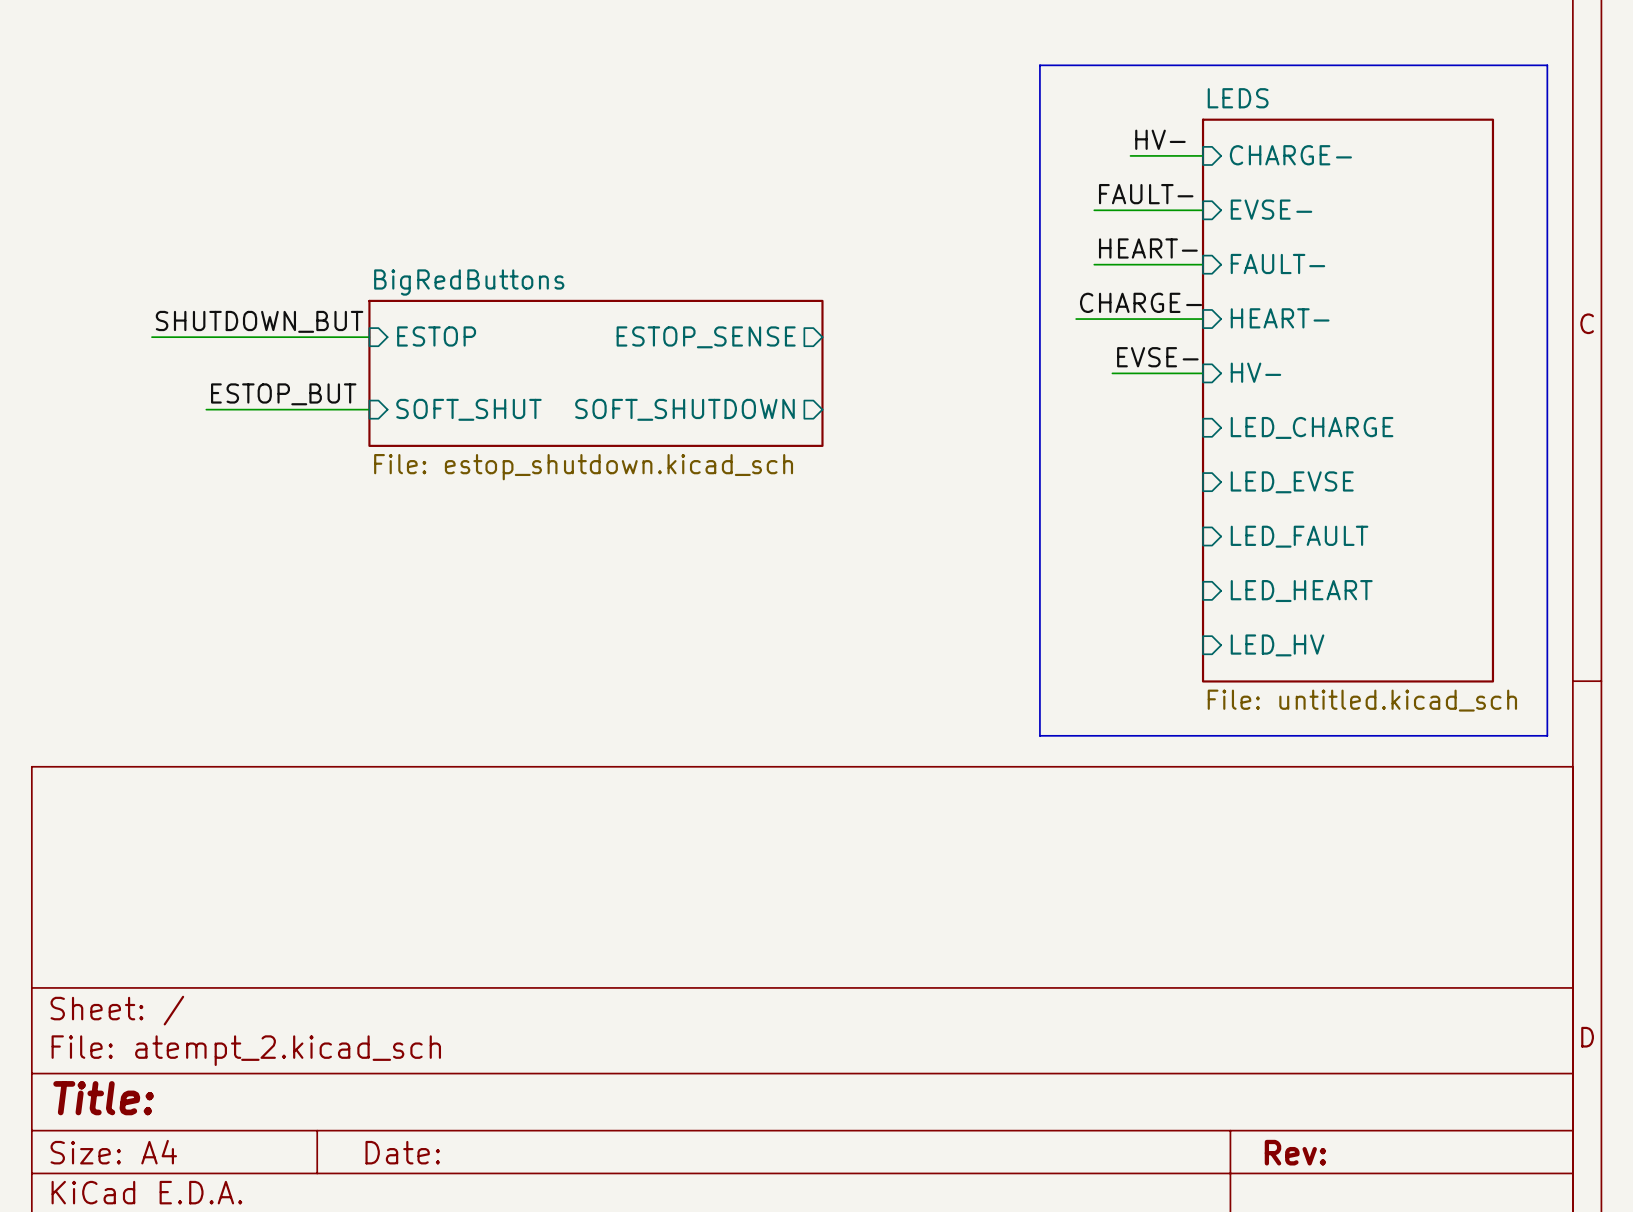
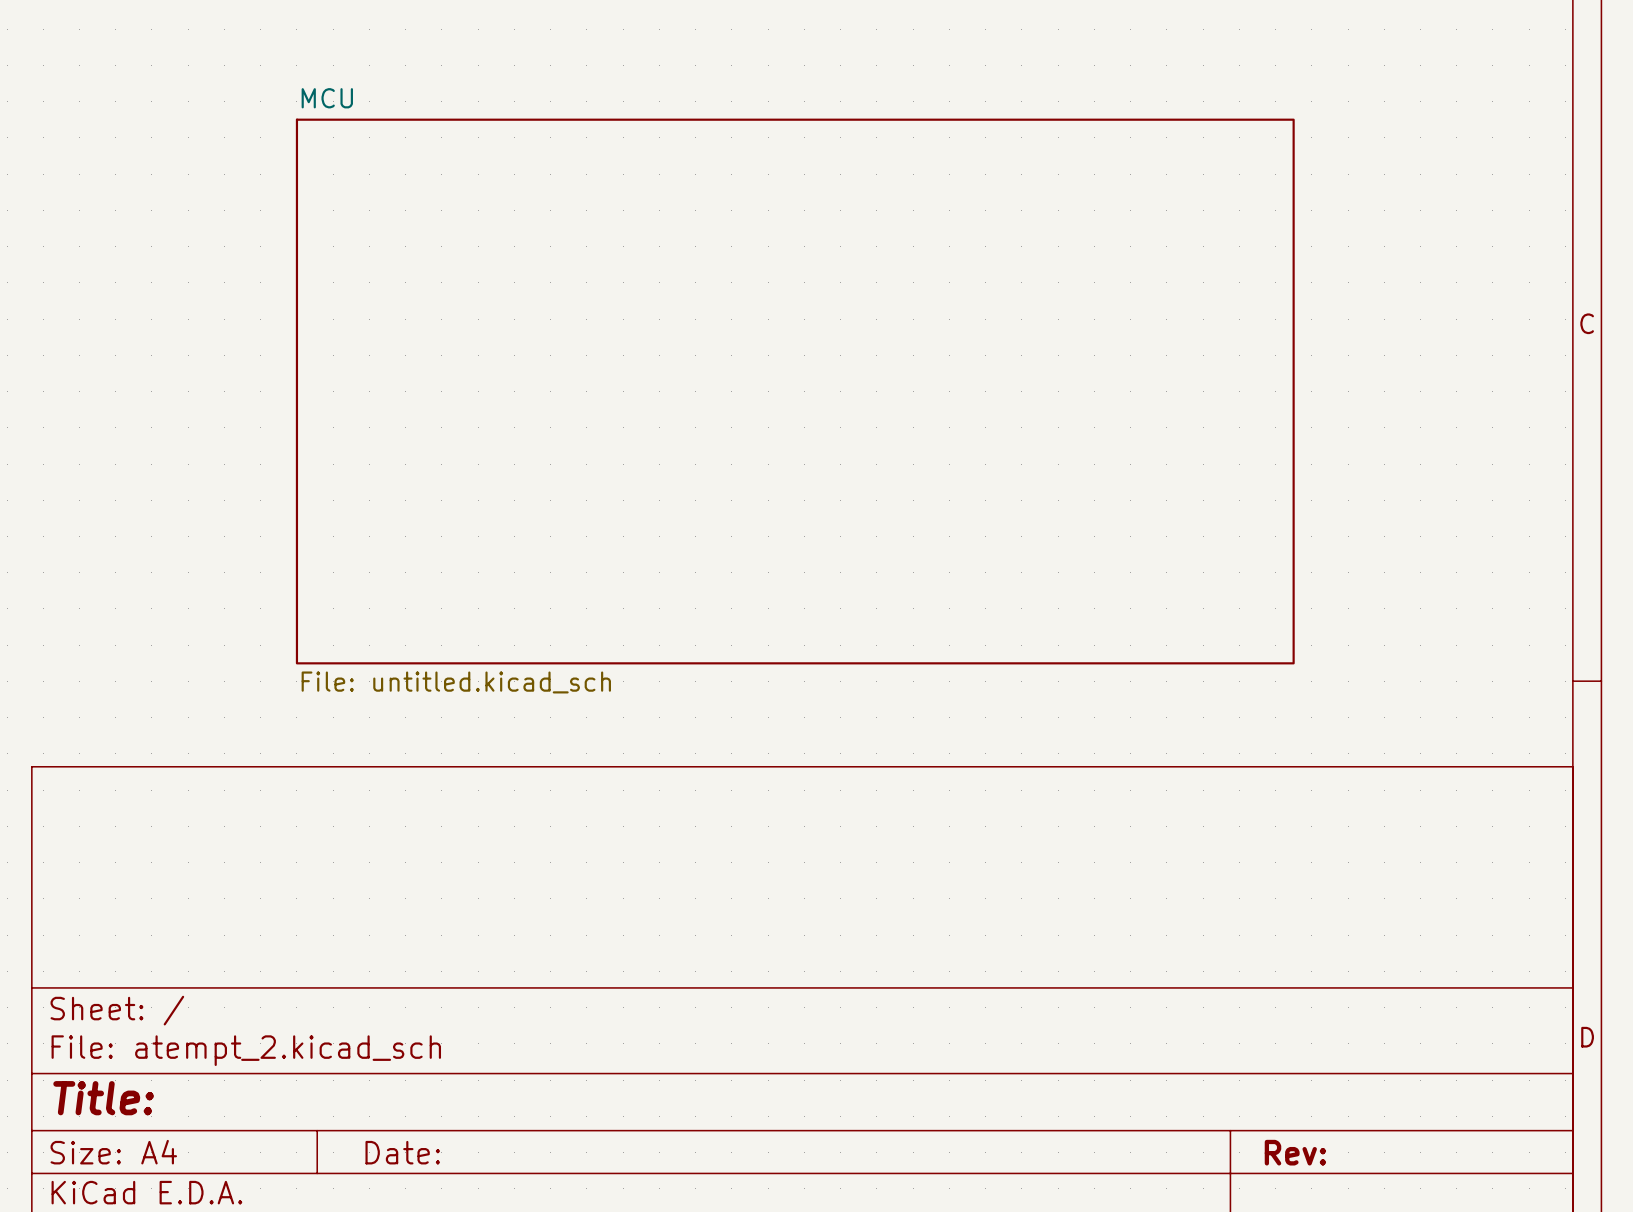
line: (1039, 65) (1547, 65) (1547, 735) (1039, 735) (1039, 65) -> none
label: HV- (1160, 139) -> none
wire: (1130, 155) (1203, 155) -> none
sheet pin: CHARGE- (1290, 155) -> none
label: FAULT- (1146, 194) -> none
sheet pin: EVSE- (1271, 209) -> none
wire: (1094, 210) (1203, 210) -> none
label: HEART- (1148, 248) -> none
sheet pin: FAULT- (1277, 263) -> none
wire: (1094, 264) (1203, 264) -> none
label: CHARGE- (1141, 302) -> none
sheet pin: HEART- (1280, 318) -> none
wire: (1076, 319) (1203, 319) -> none
label: SHUTDOWN_BUT (259, 321) -> none
sheet pin: ESTOP (436, 336) -> none
wire: (151, 337) (369, 337) -> none
sheet pin: ESTOP_SENSE (706, 337) -> none
label: EVSE- (1157, 357) -> none
sheet pin: HV- (1255, 372) -> none
sheet BigRedButtons: File: estop_shutdown.kicad_sch (595, 373) -> none
wire: (1112, 373) (1203, 373) -> none
sheet MCU: none -> File: untitled.kicad_sch (795, 391)
label: ESTOP_BUT (283, 394) -> none
sheet LEDS: File: untitled.kicad_sch (1348, 400) -> none
wire: (206, 409) (369, 409) -> none
sheet pin: SOFT_SHUT (468, 409) -> none
sheet pin: SOFT_SHUTDOWN (684, 409) -> none
sheet pin: LED_CHARGE (1312, 427) -> none
sheet pin: LED_EVSE (1292, 482) -> none
sheet pin: LED_FAULT (1299, 536) -> none
sheet pin: LED_HEART (1301, 591) -> none
sheet pin: LED_HV (1277, 645) -> none

